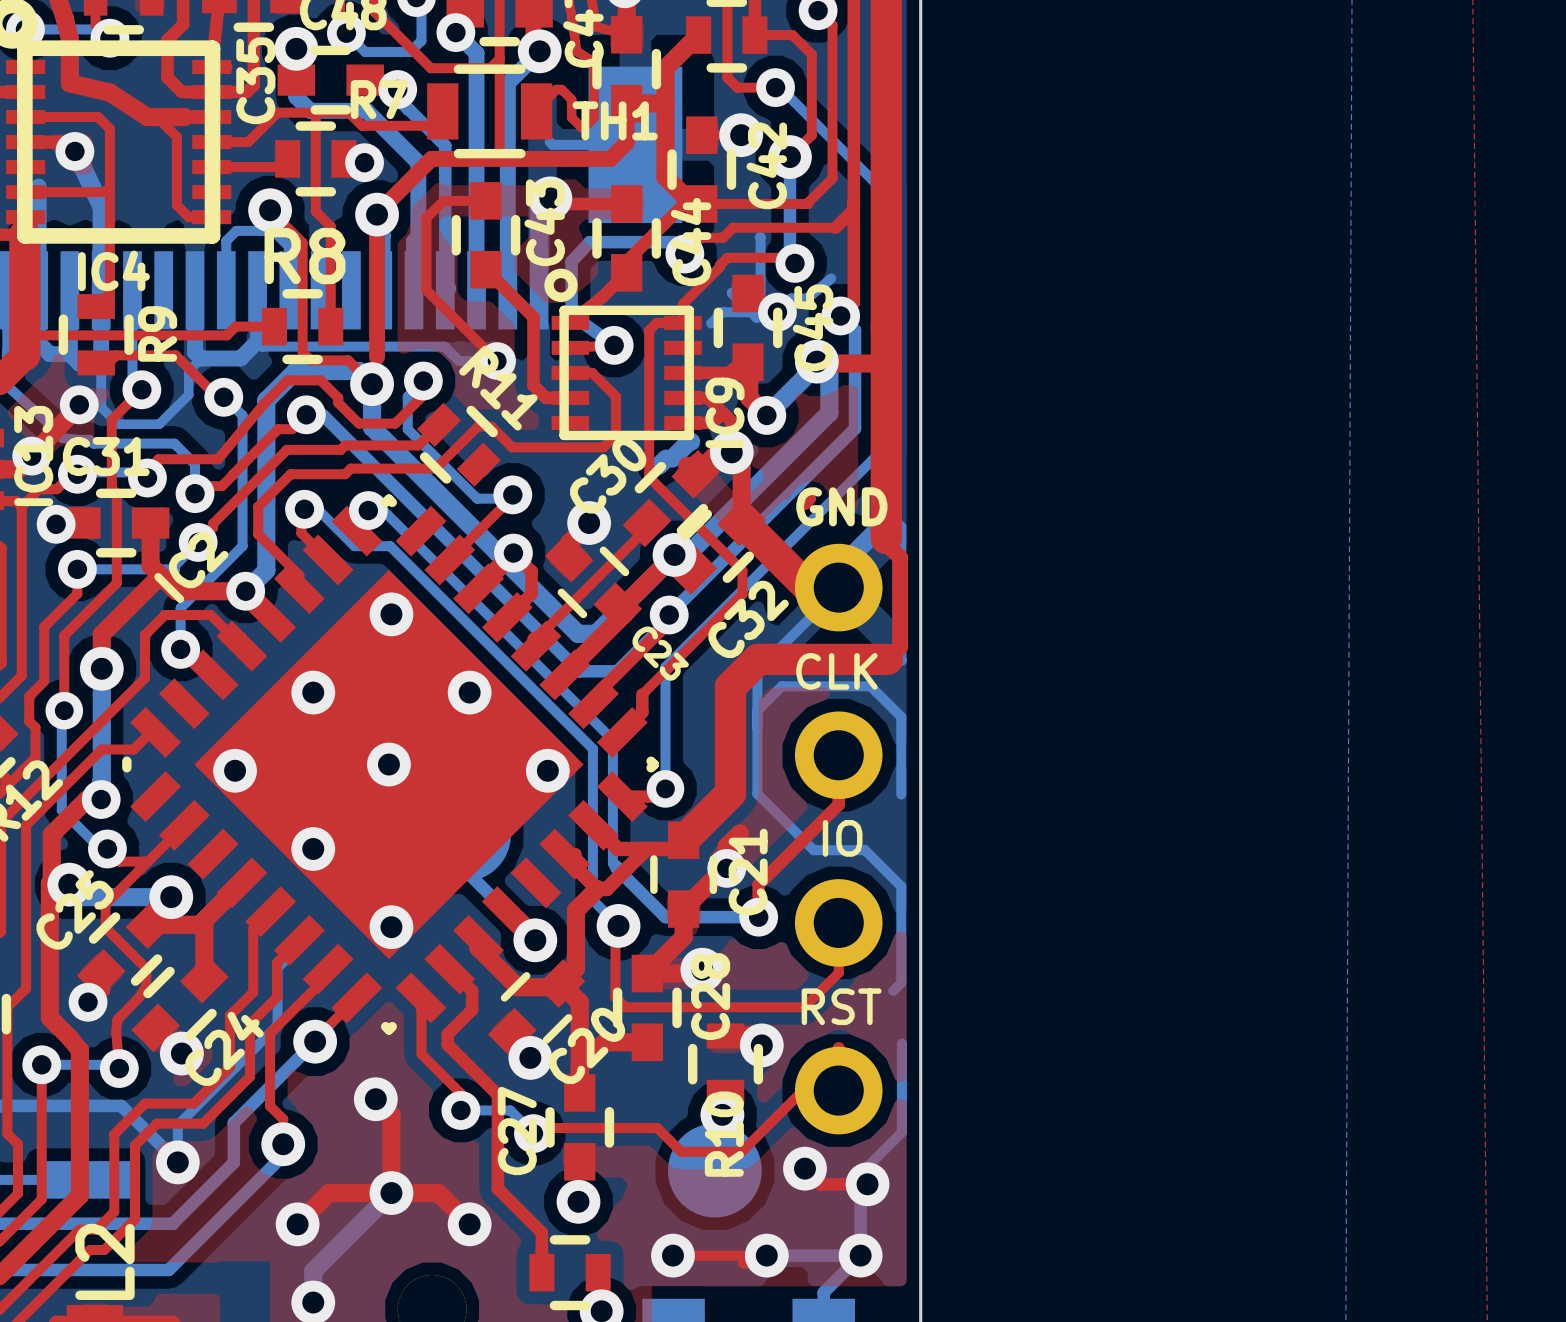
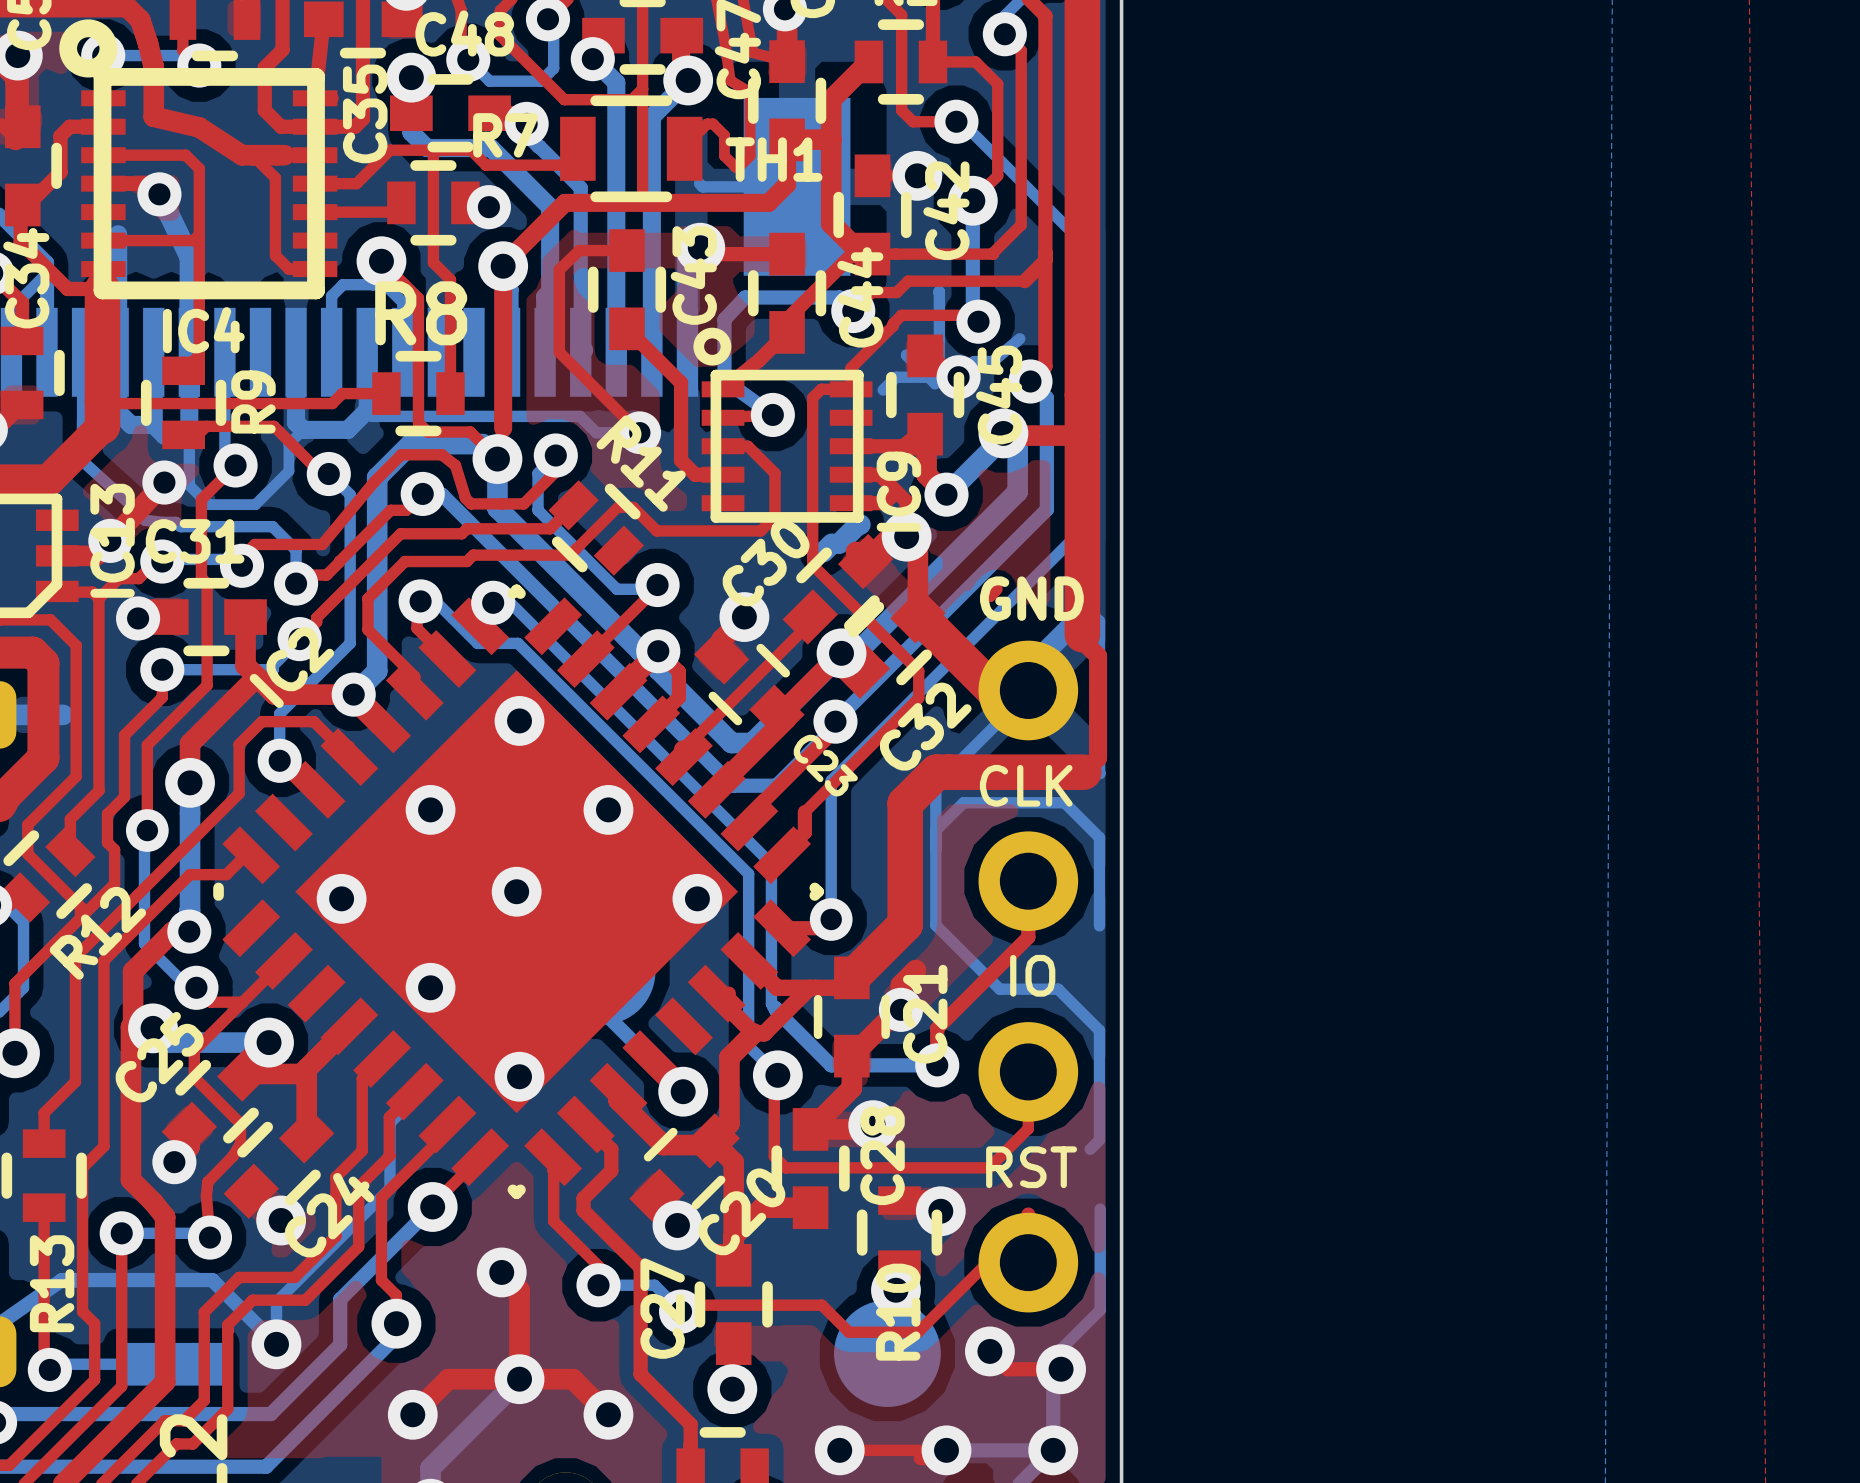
top track: (320, 380) (338, 397) (338, 402) (358, 423) -> (439, 454) (441, 454) (455, 465) (465, 497)
top track: none -> (465, 498) (471, 503) (482, 503)

